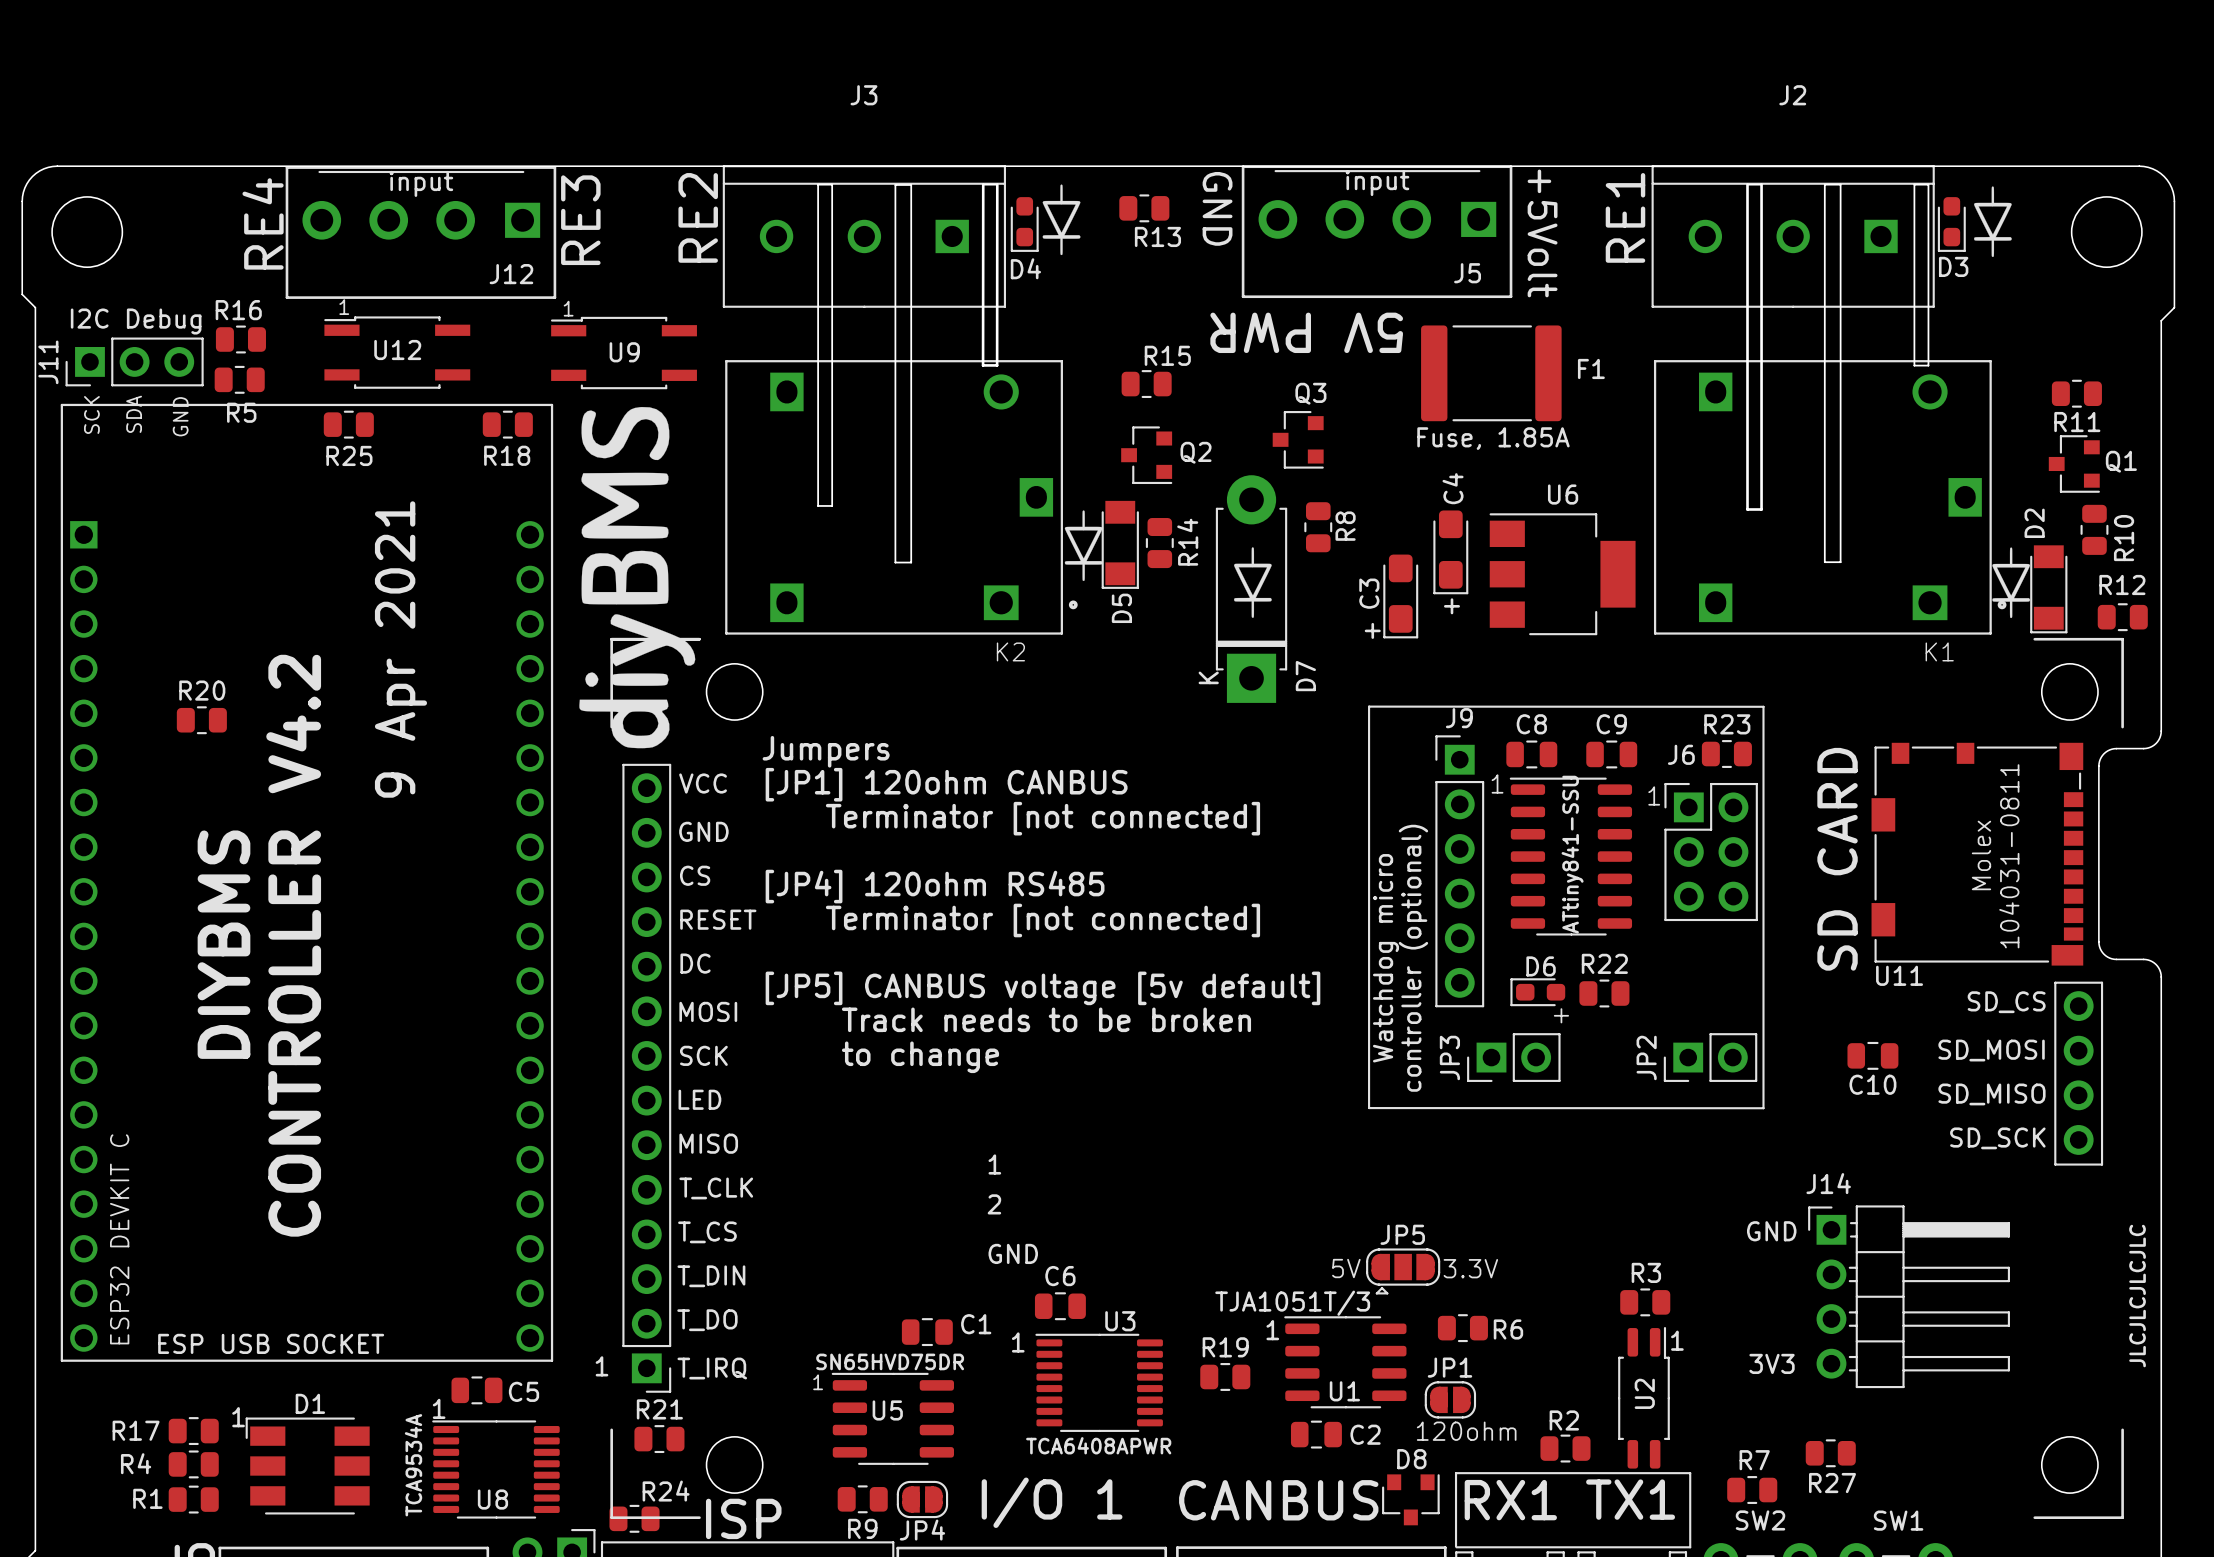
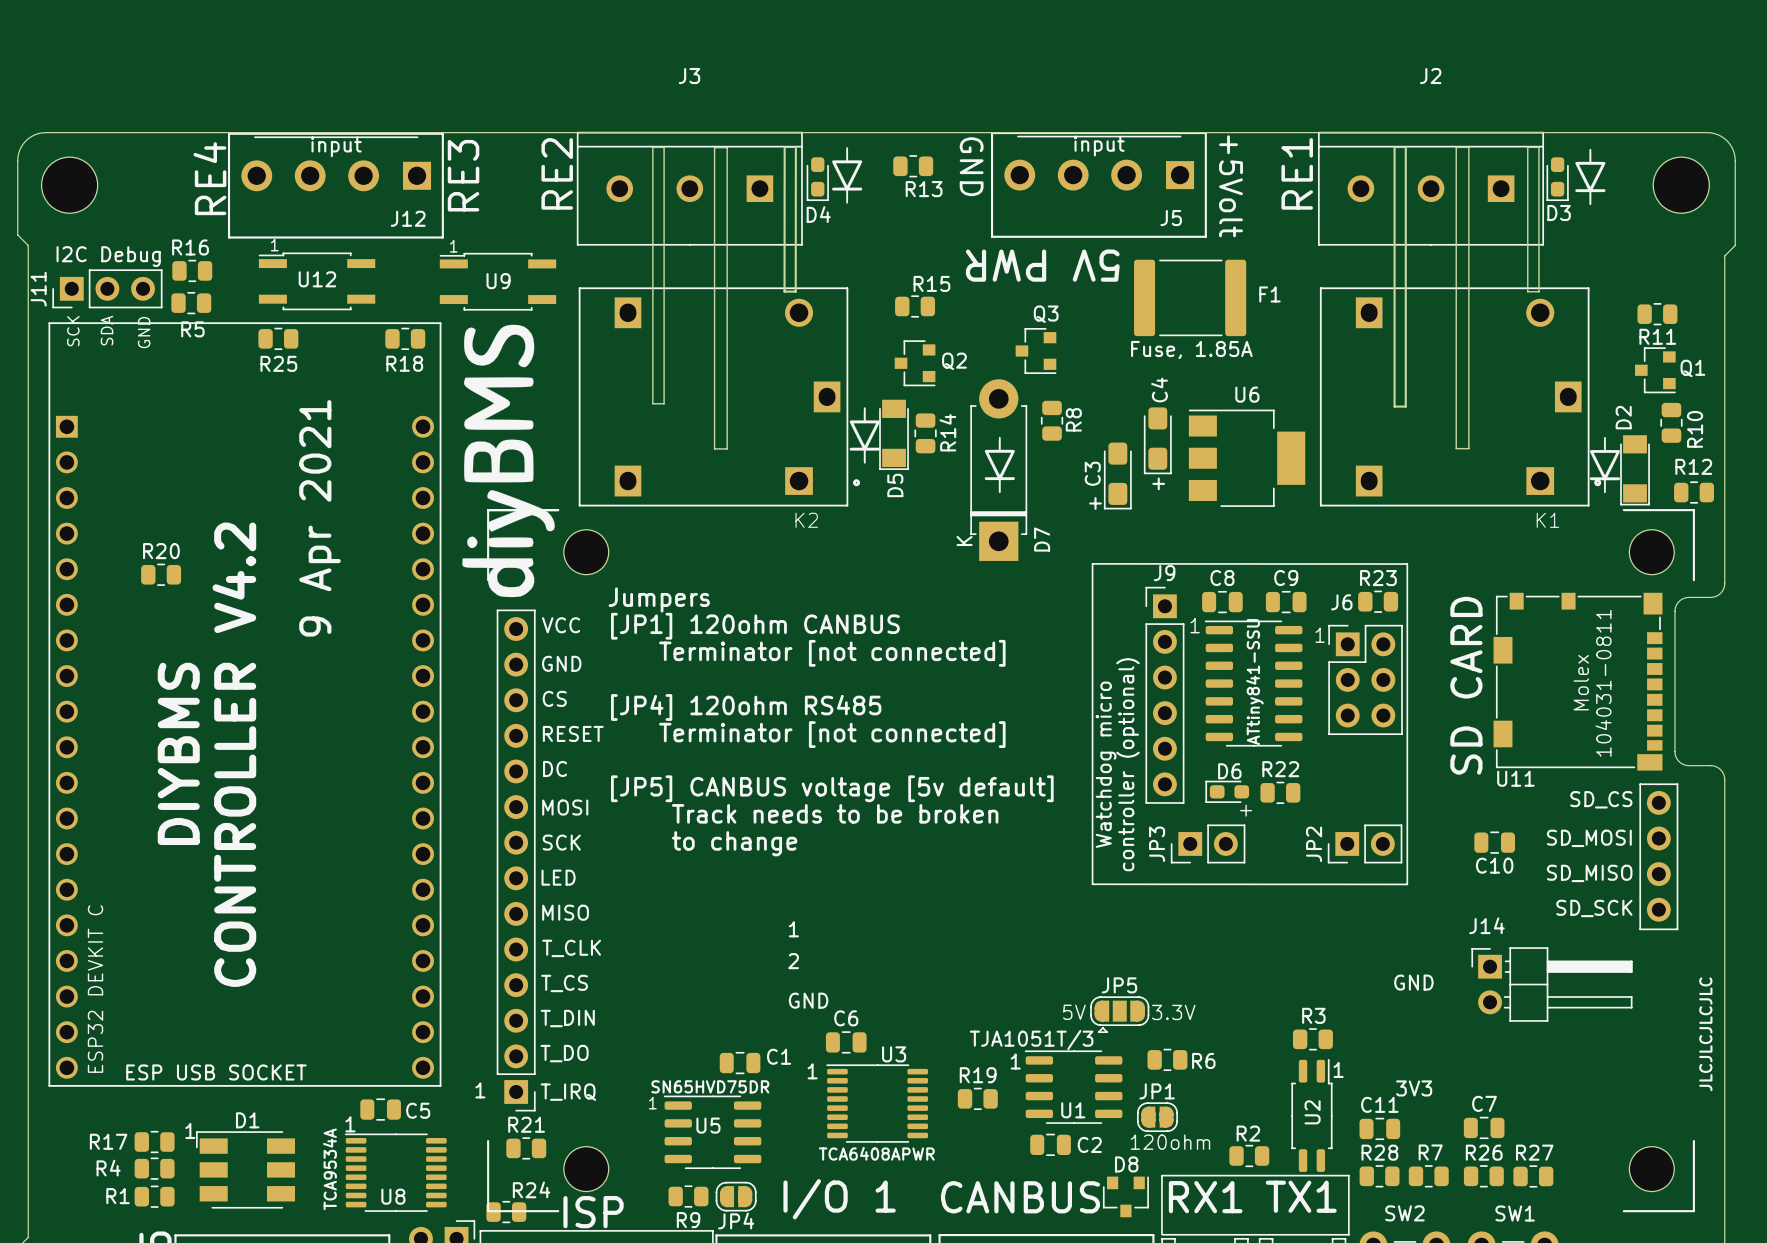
J14 name position: J14 (1828, 1183) -> J14 (1486, 925)
J14 footprint: [1808, 1205, 2010, 1389] -> [1471, 947, 1633, 1022]
C7: none -> (1484, 1127)
C11: none -> (1379, 1128)
R27 position: (1830, 1453) -> (1533, 1176)
R28: none -> (1379, 1176)
R26: none -> (1483, 1176)
R27 name position: R27 (1832, 1483) -> R27 (1534, 1152)
R7 position: (1752, 1490) -> (1428, 1176)

